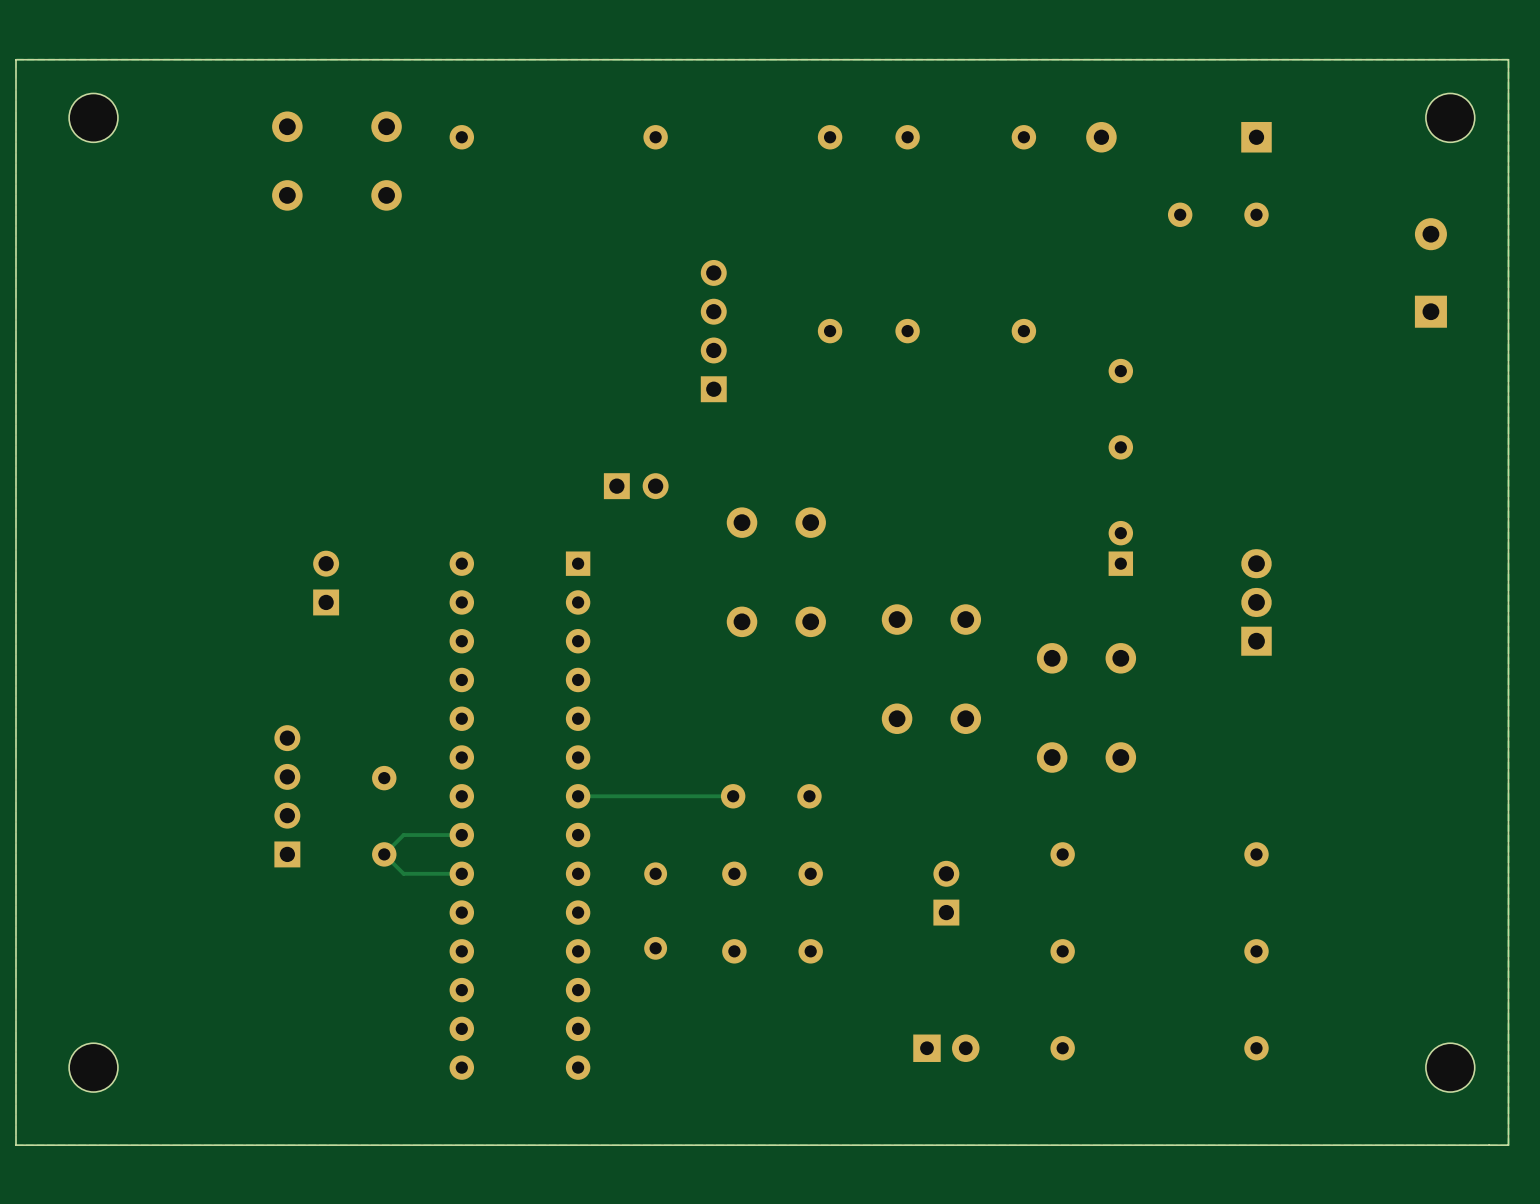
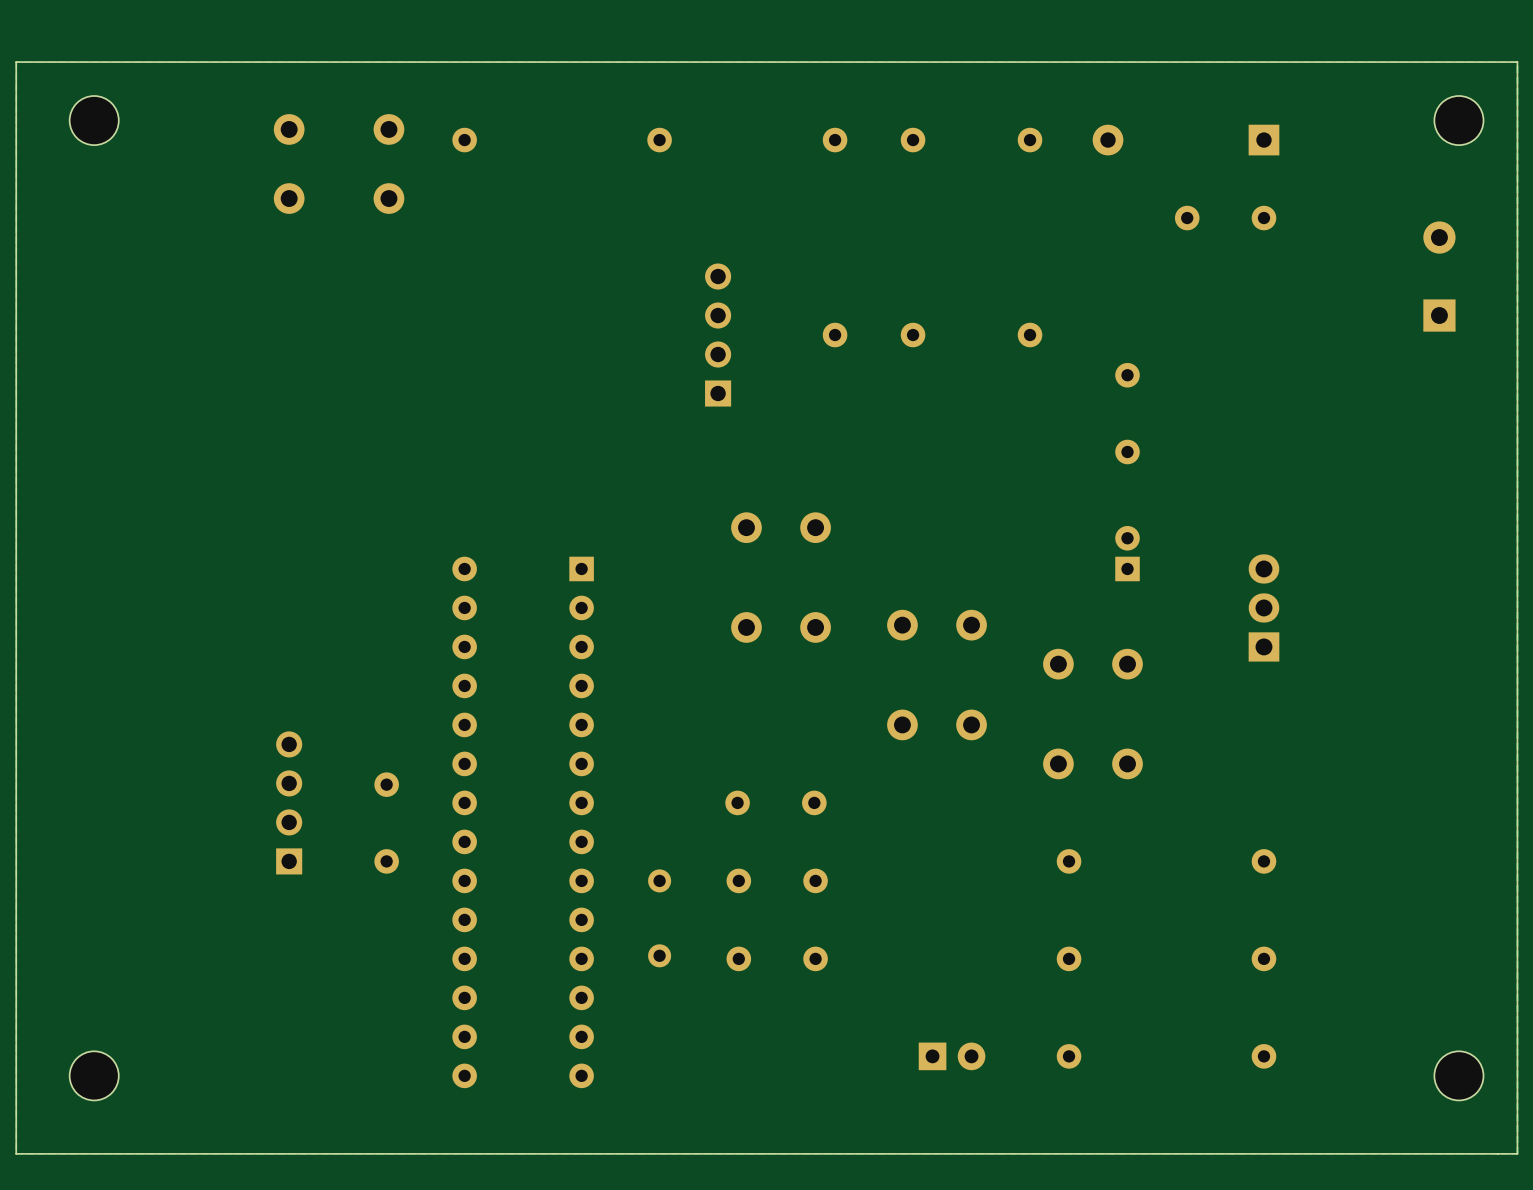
part: (636, 486) -> none
part: (326, 583) -> none
track: (733, 796) (578, 796) -> none
track: (461, 835) (403, 835) (384, 854) (403, 873) (461, 873) -> none
part: (946, 893) -> none

